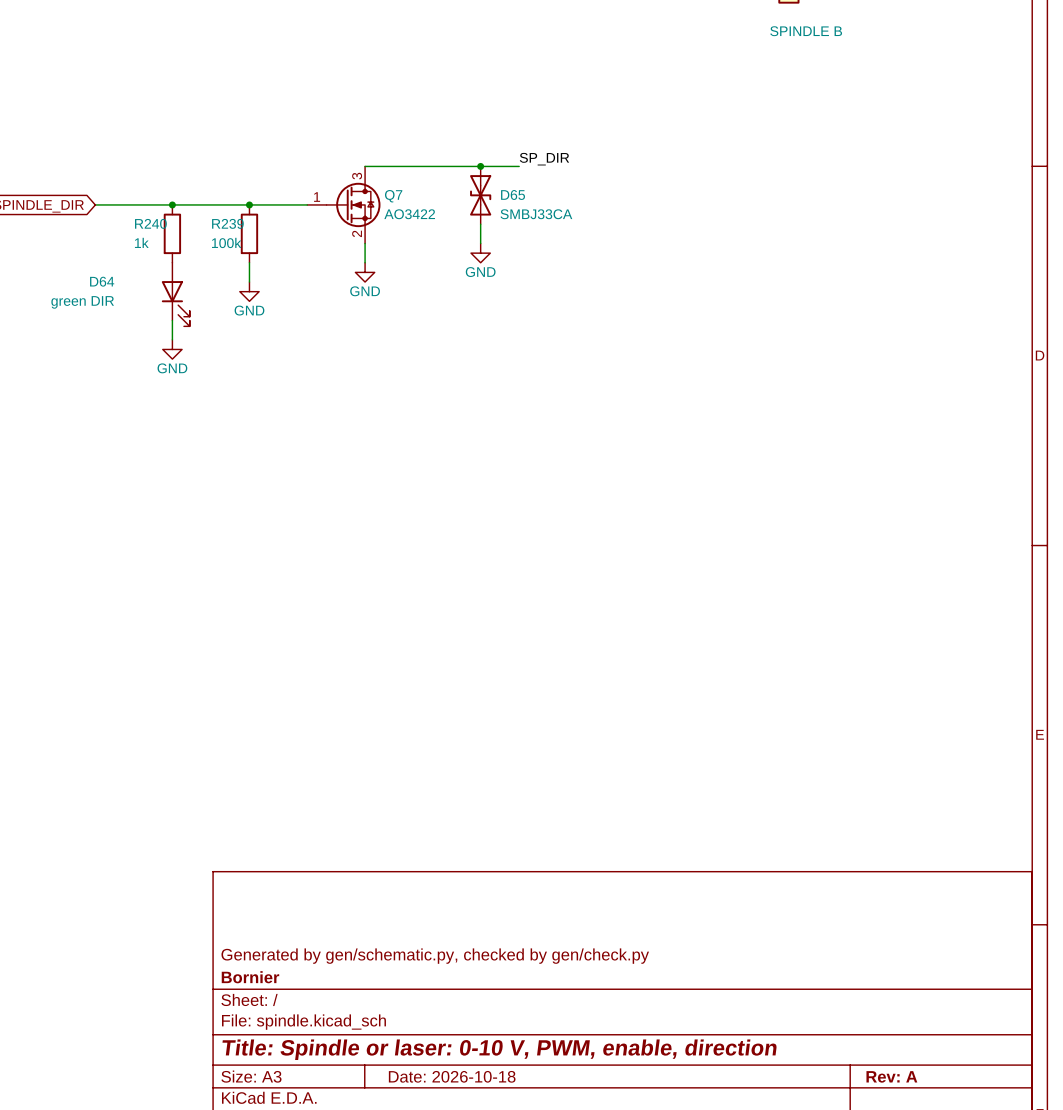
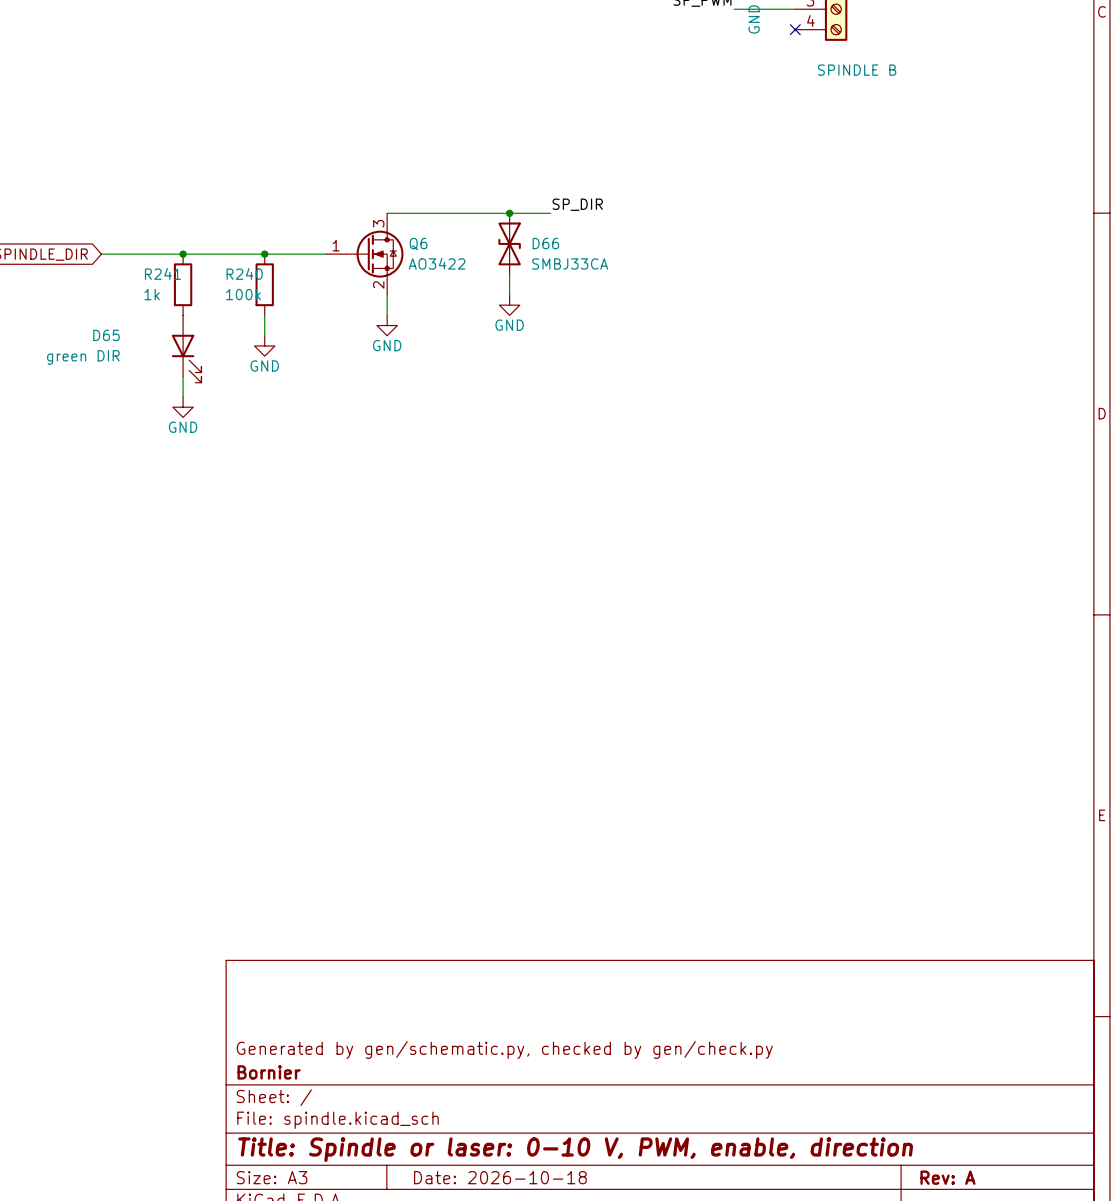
D65 name: D65 (513, 194) -> D66 (545, 243)
Q7 name: Q7 (393, 196) -> Q6 (418, 244)
R240 name: R240 (150, 223) -> R241 (162, 273)
R239 name: R239 (227, 223) -> R240 (244, 273)
D64 name: D64 (102, 281) -> D65 (106, 335)

